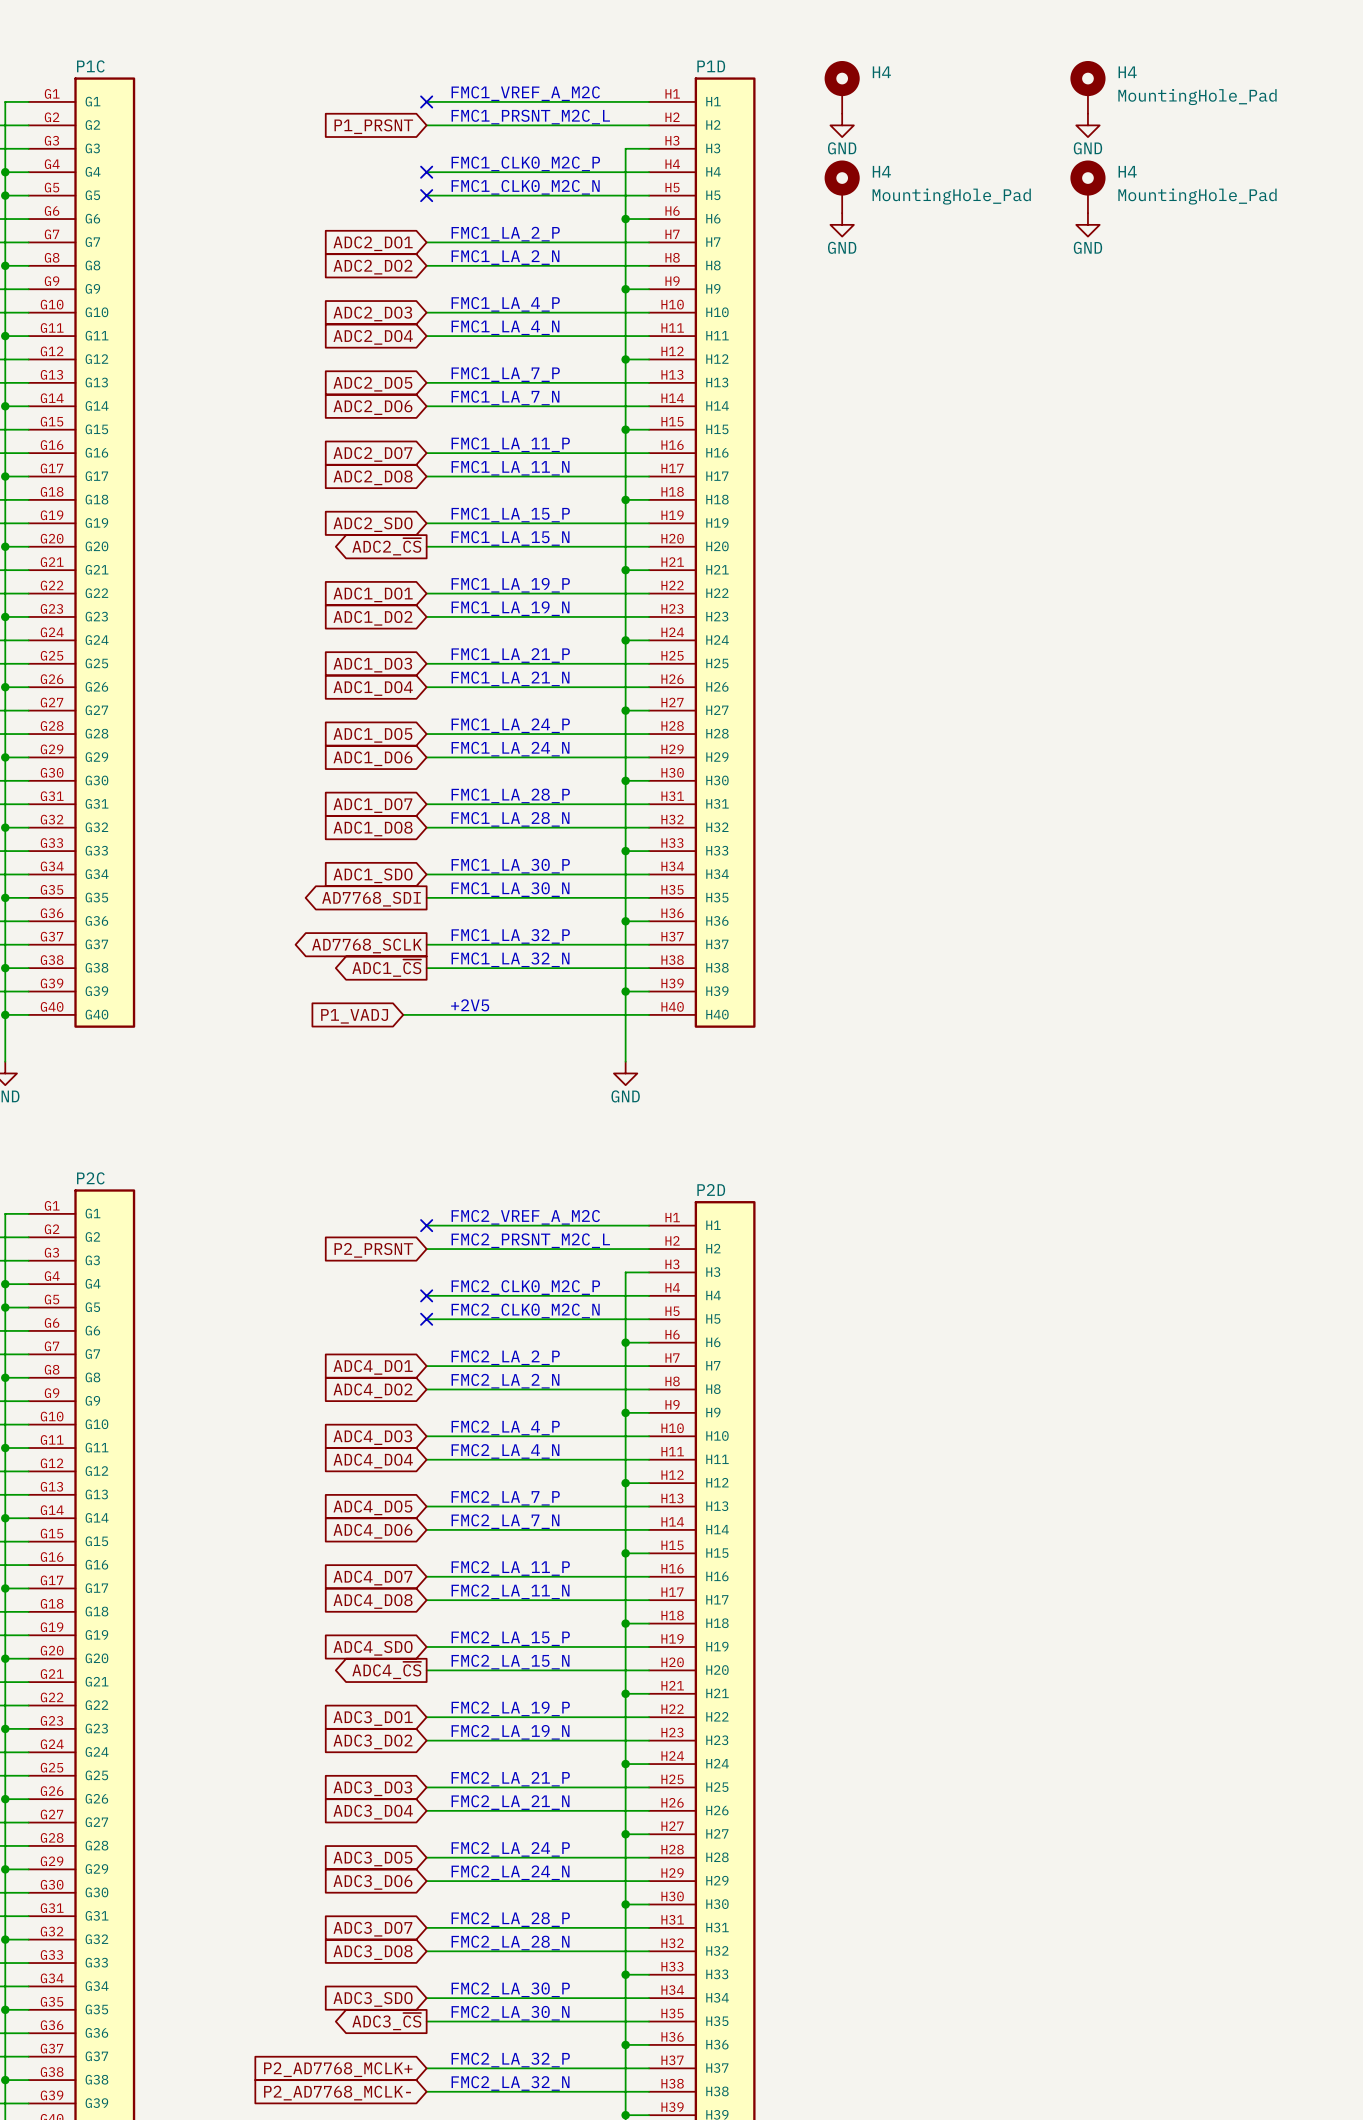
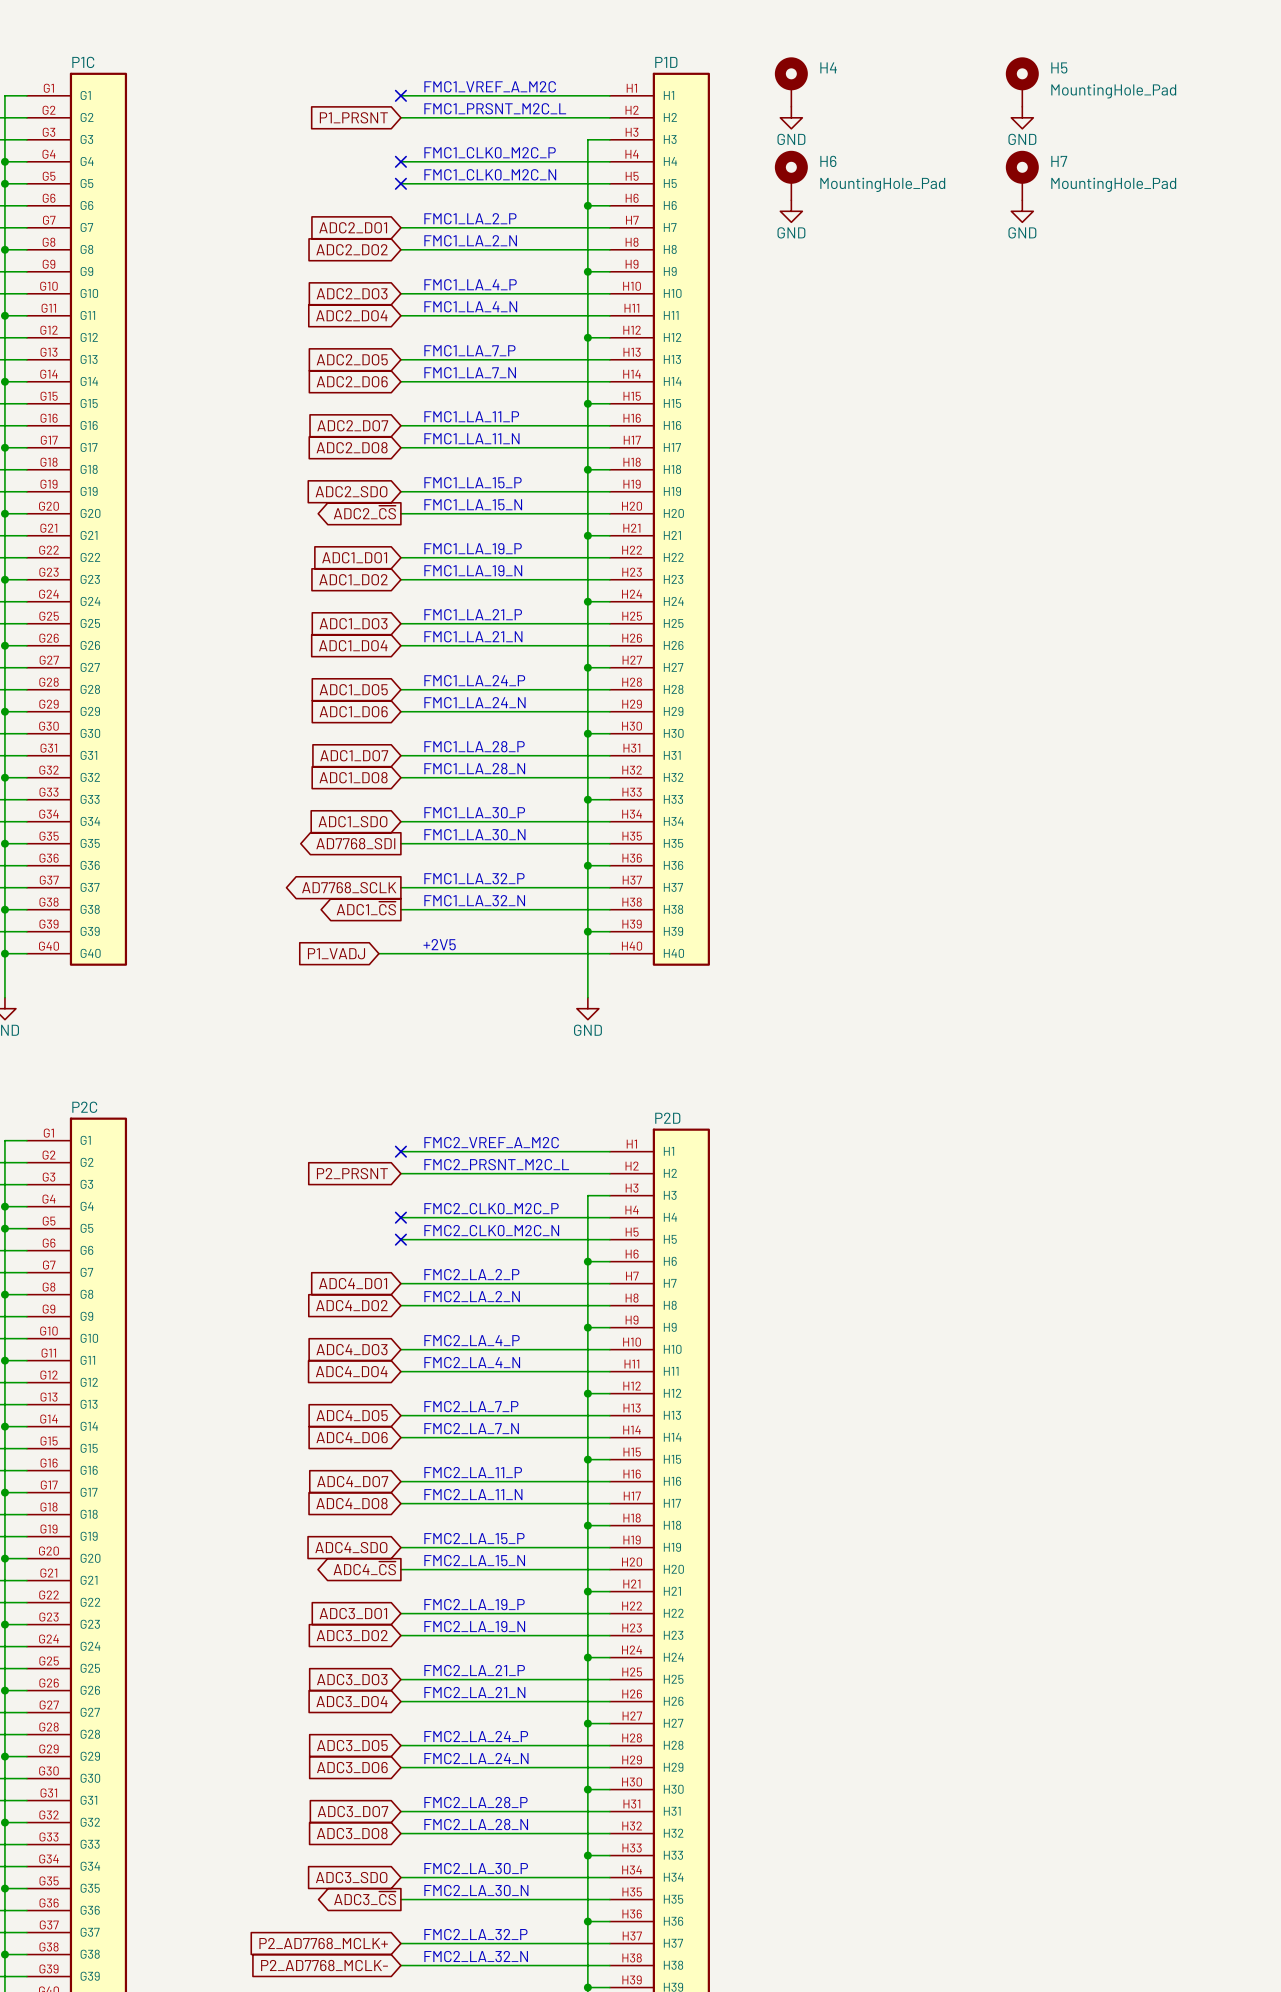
H4 name: H4 (1127, 72) -> H5 (1059, 67)
H4 name: H4 (881, 171) -> H6 (828, 161)
H4 name: H4 (1127, 171) -> H7 (1059, 161)

